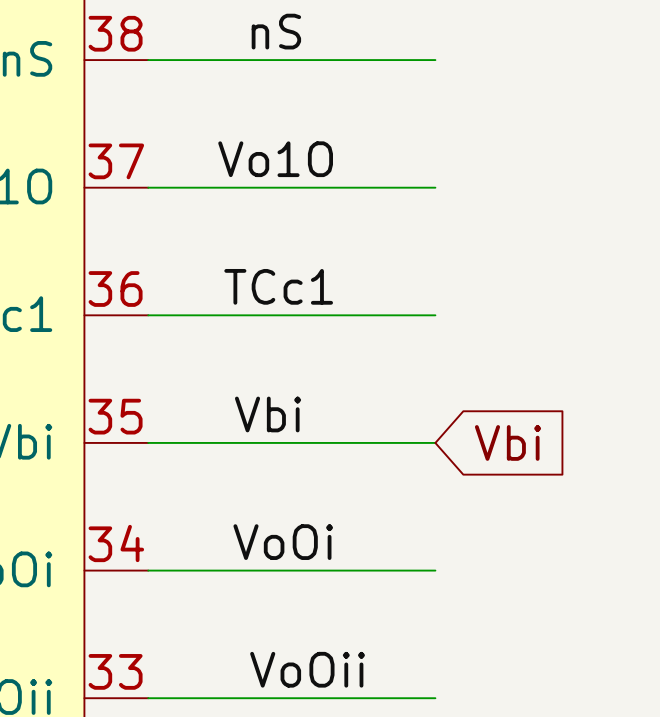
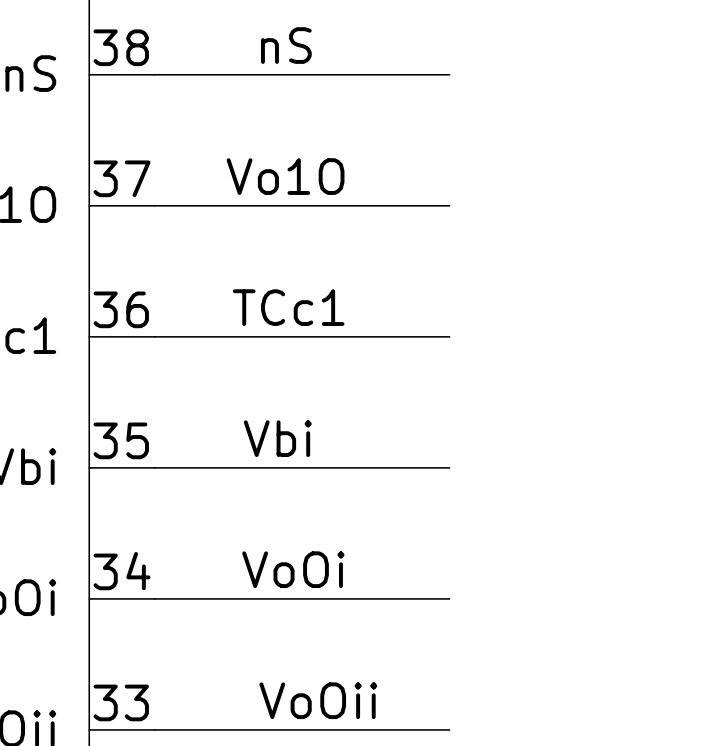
global label: Vbi (508, 442) -> none

